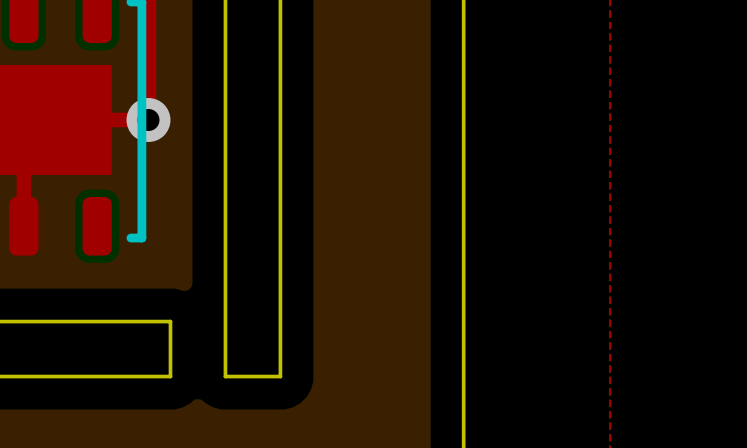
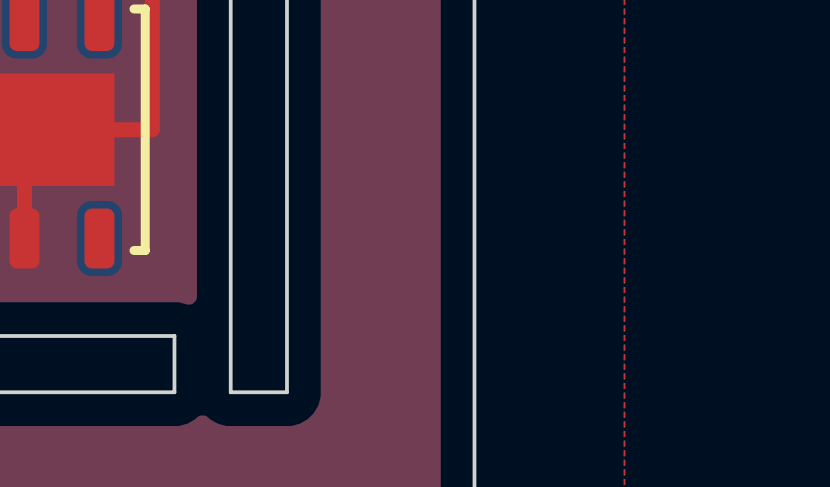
via: (148, 120) -> none

